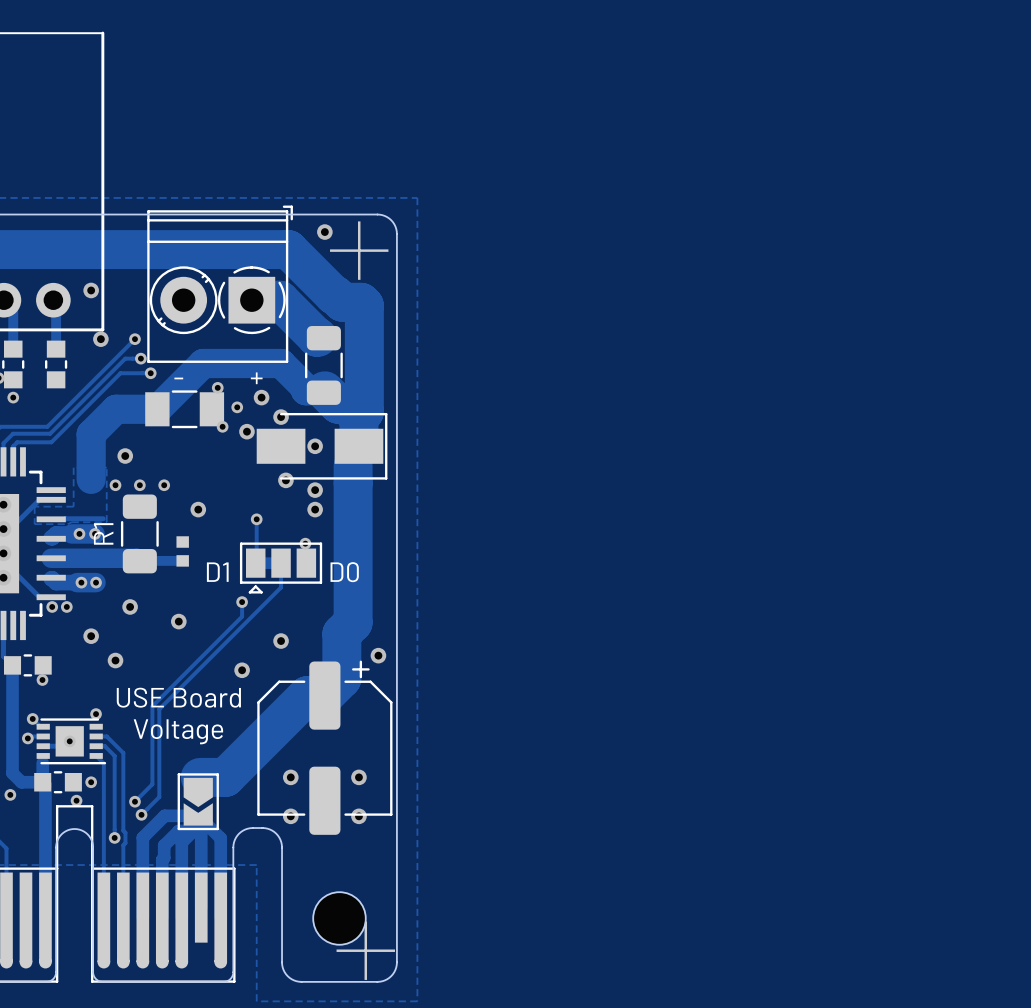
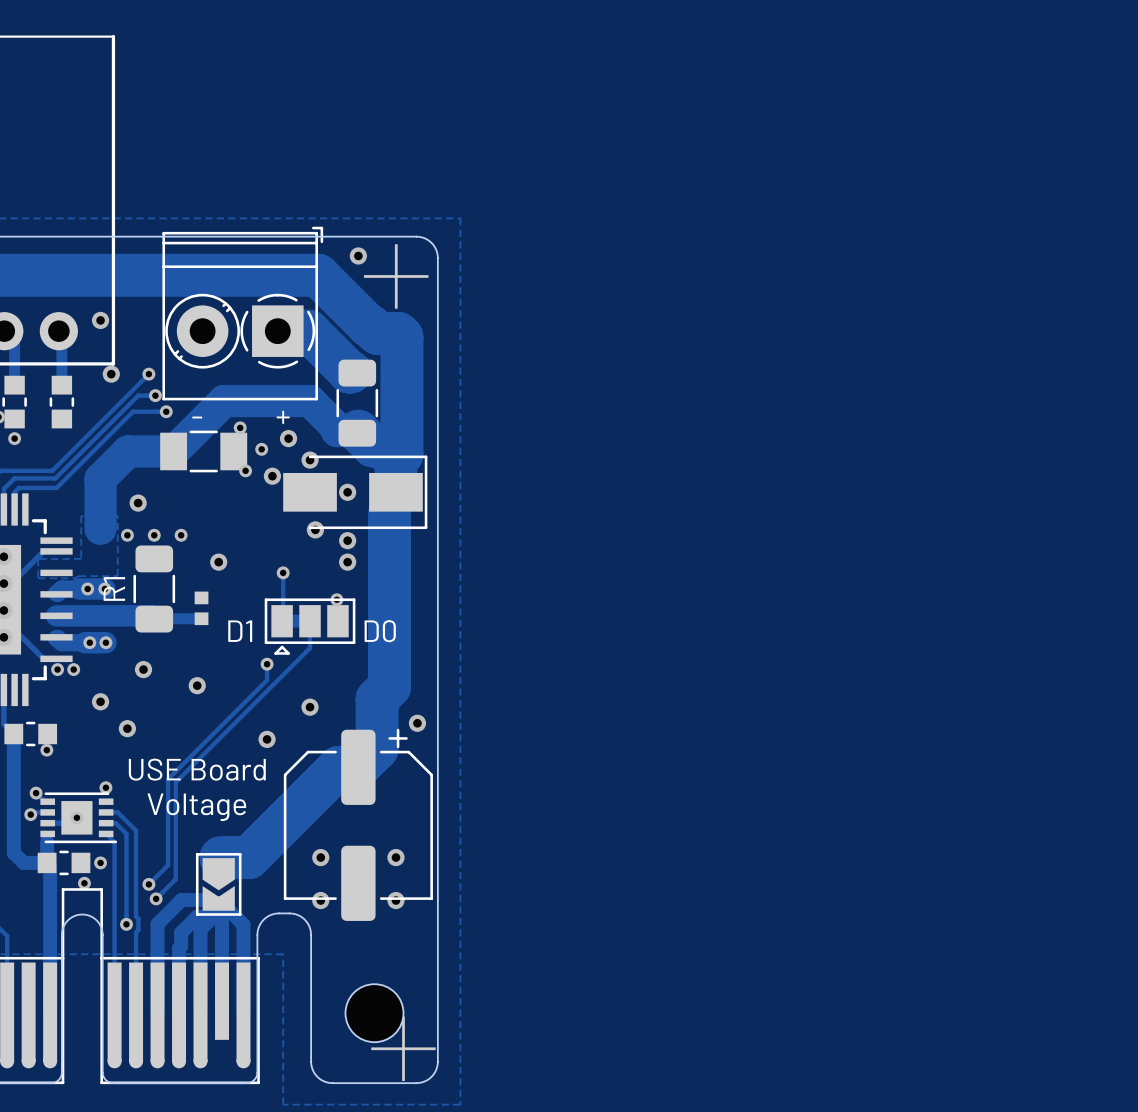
track: (103, 518) (51, 519) -> none
via: (10, 794) -> none

